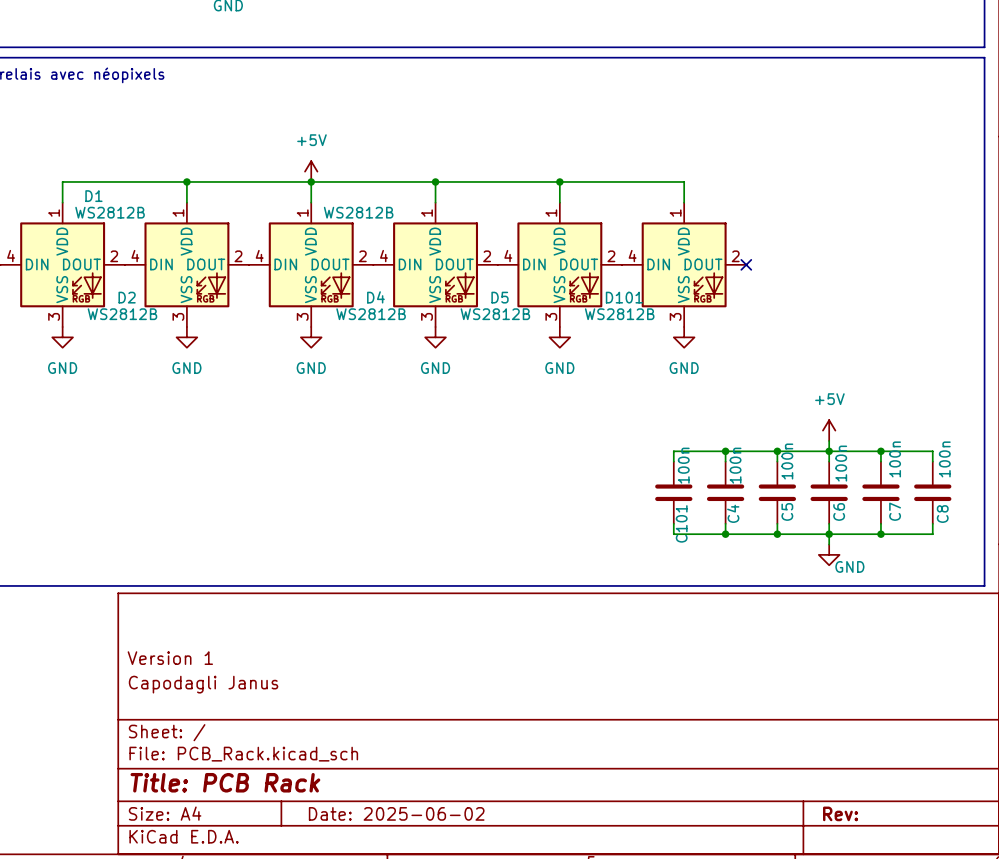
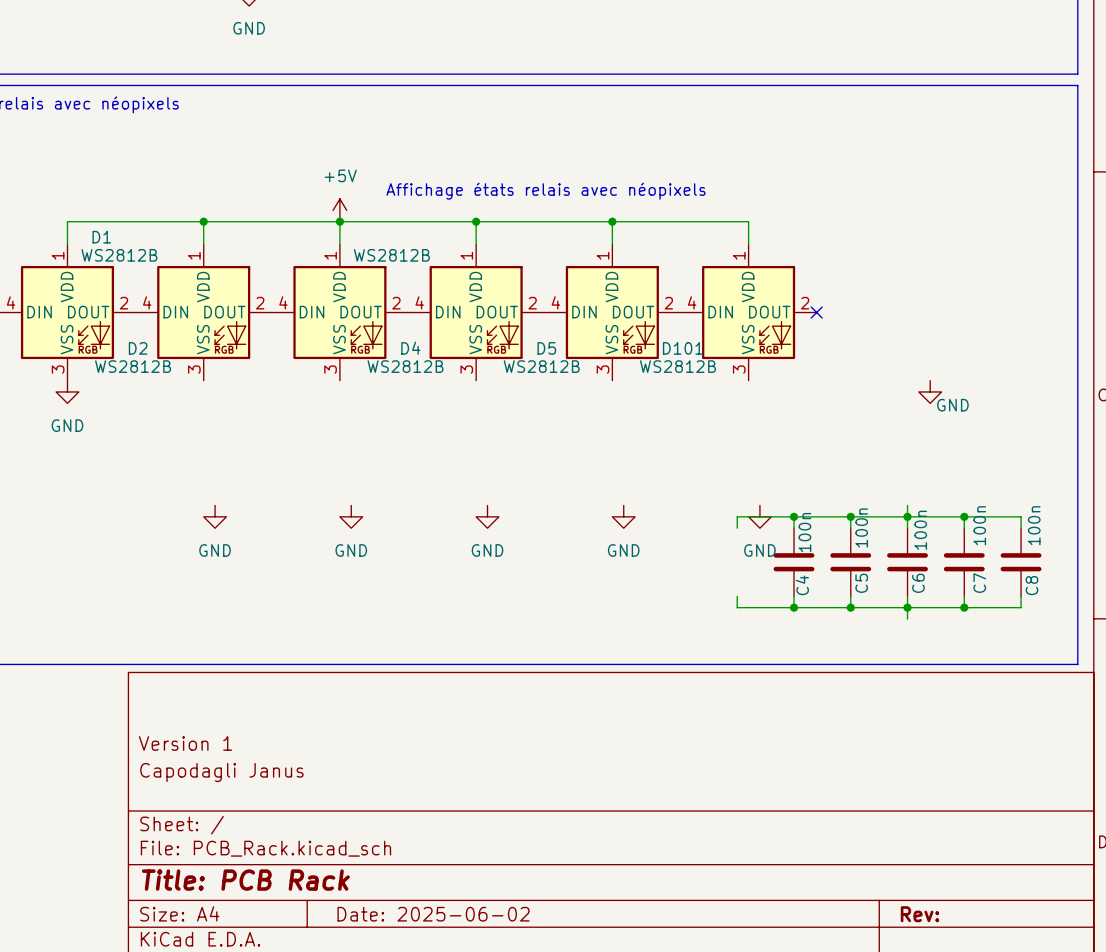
text: none -> Affichage états relais avec néopixels (545, 191)
power symbol: GND (186, 337) -> none
power symbol: GND (311, 337) -> none
power symbol: GND (435, 337) -> none
power symbol: GND (559, 337) -> none
power symbol: GND (684, 337) -> none
power symbol: none -> GND (930, 391)
power symbol: +5V (829, 430) -> none
power symbol: none -> GND (215, 516)
power symbol: none -> GND (351, 516)
power symbol: none -> GND (487, 516)
power symbol: none -> GND (623, 516)
power symbol: none -> GND (759, 516)
C101: 100n (673, 492) -> none
power symbol: GND (829, 554) -> none

